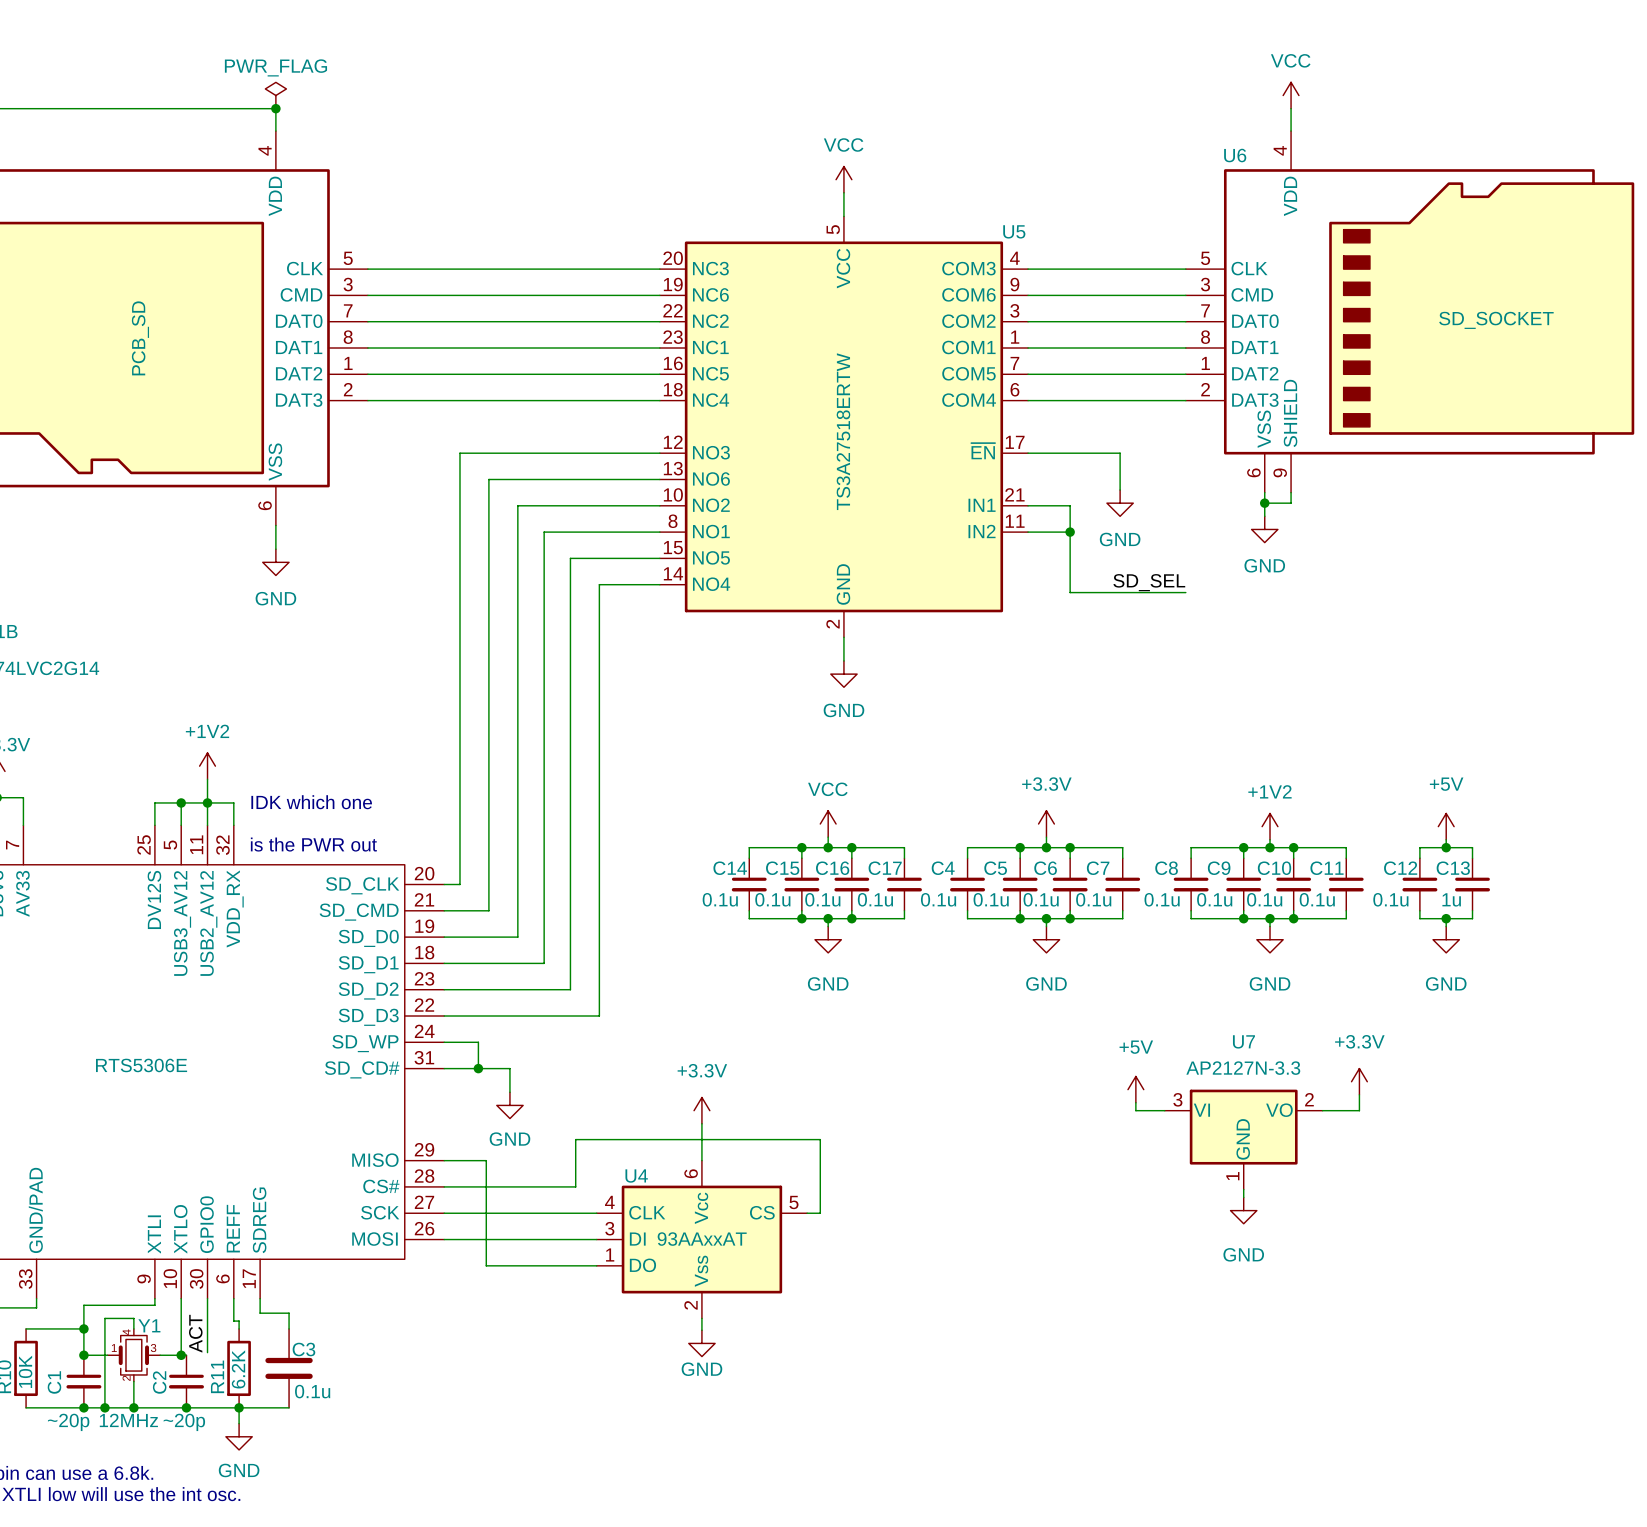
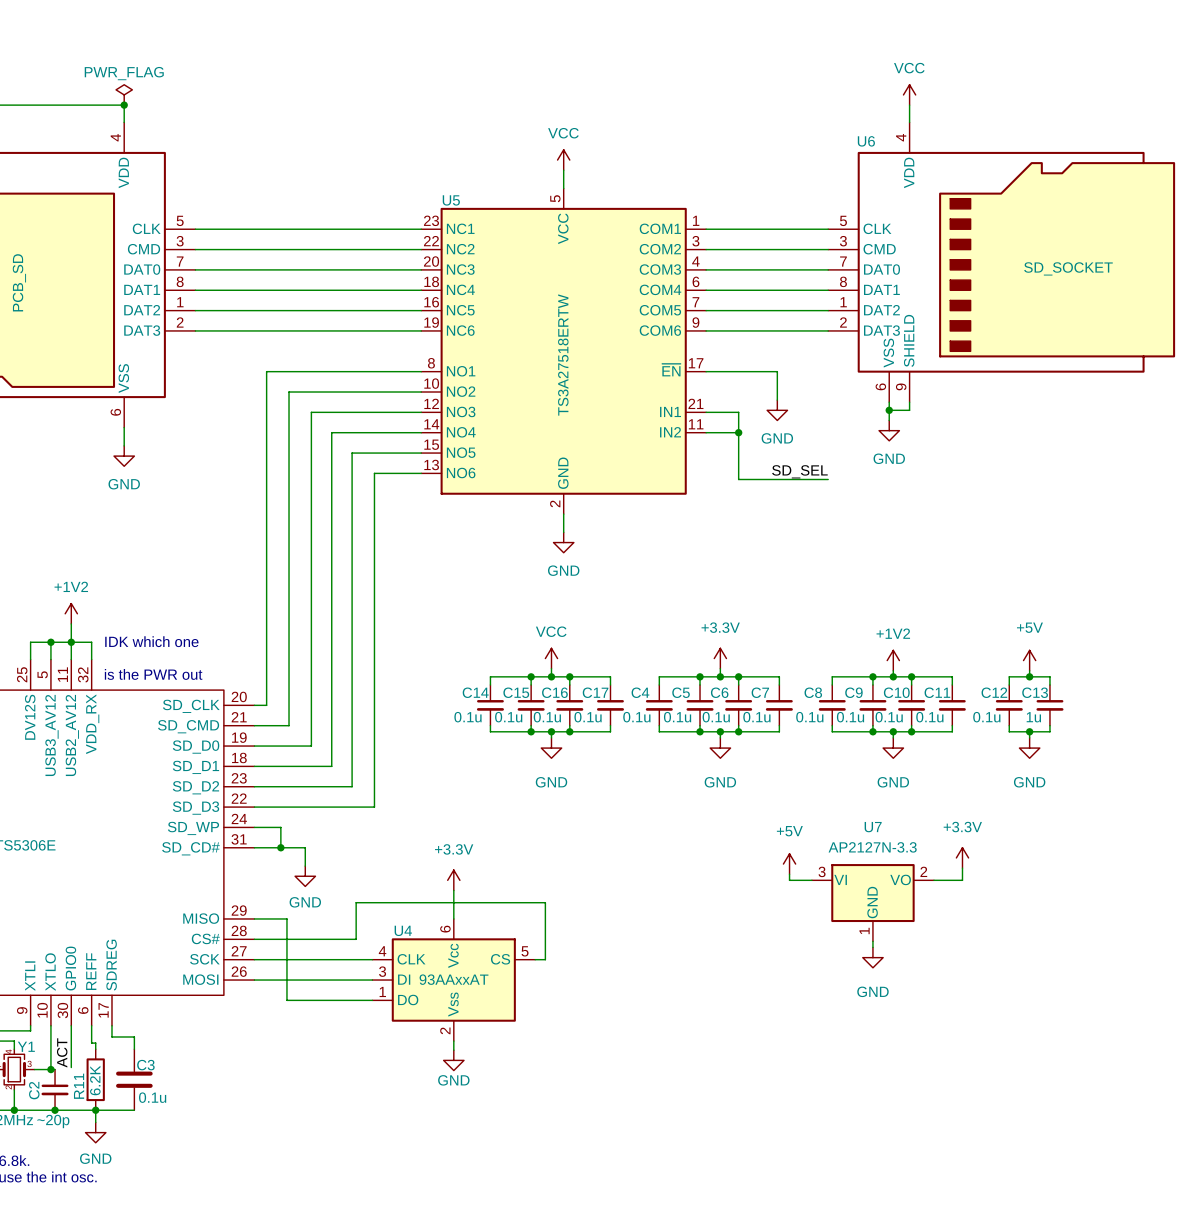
U5 symbol: [659, 216, 1029, 638] -> [421, 188, 707, 515]
U5 name position: U5 (1014, 231) -> U5 (451, 200)

